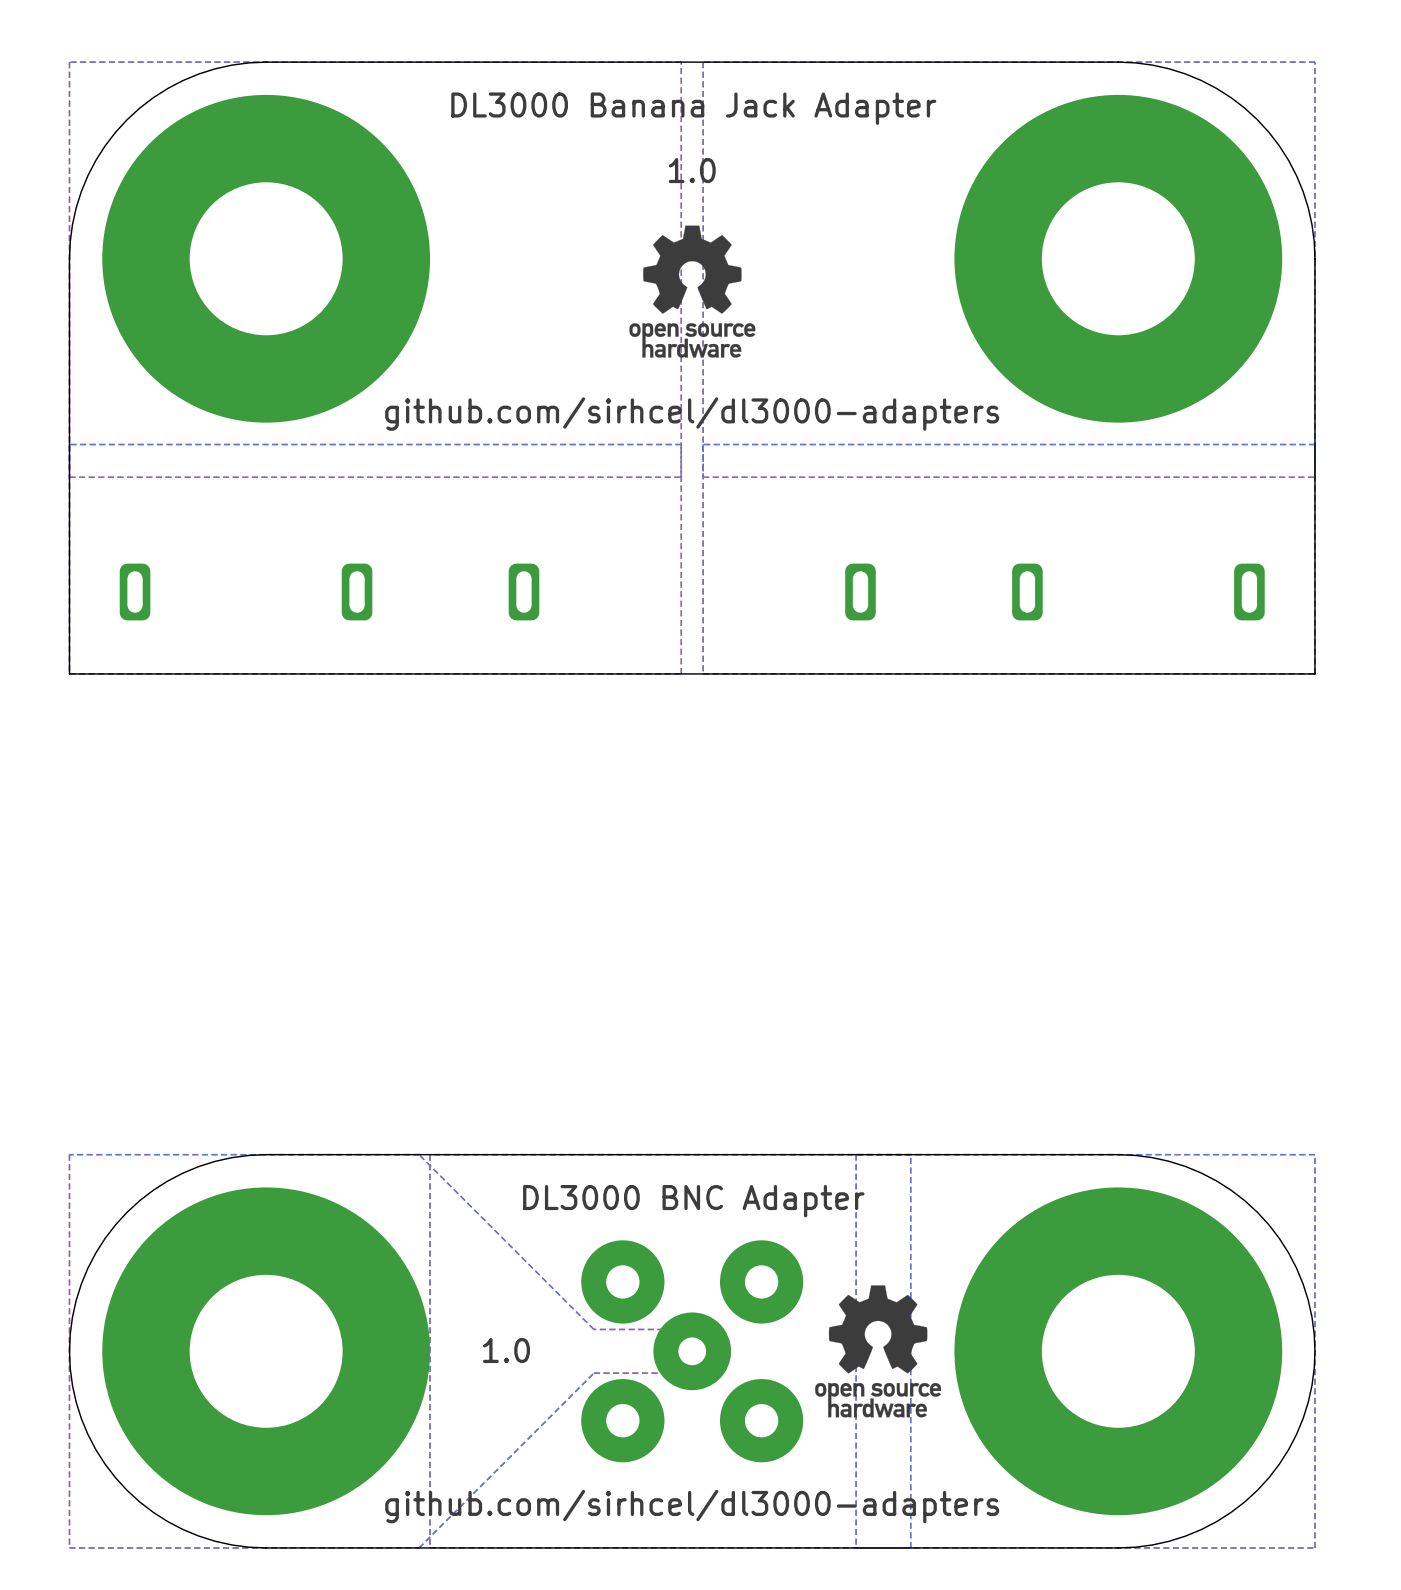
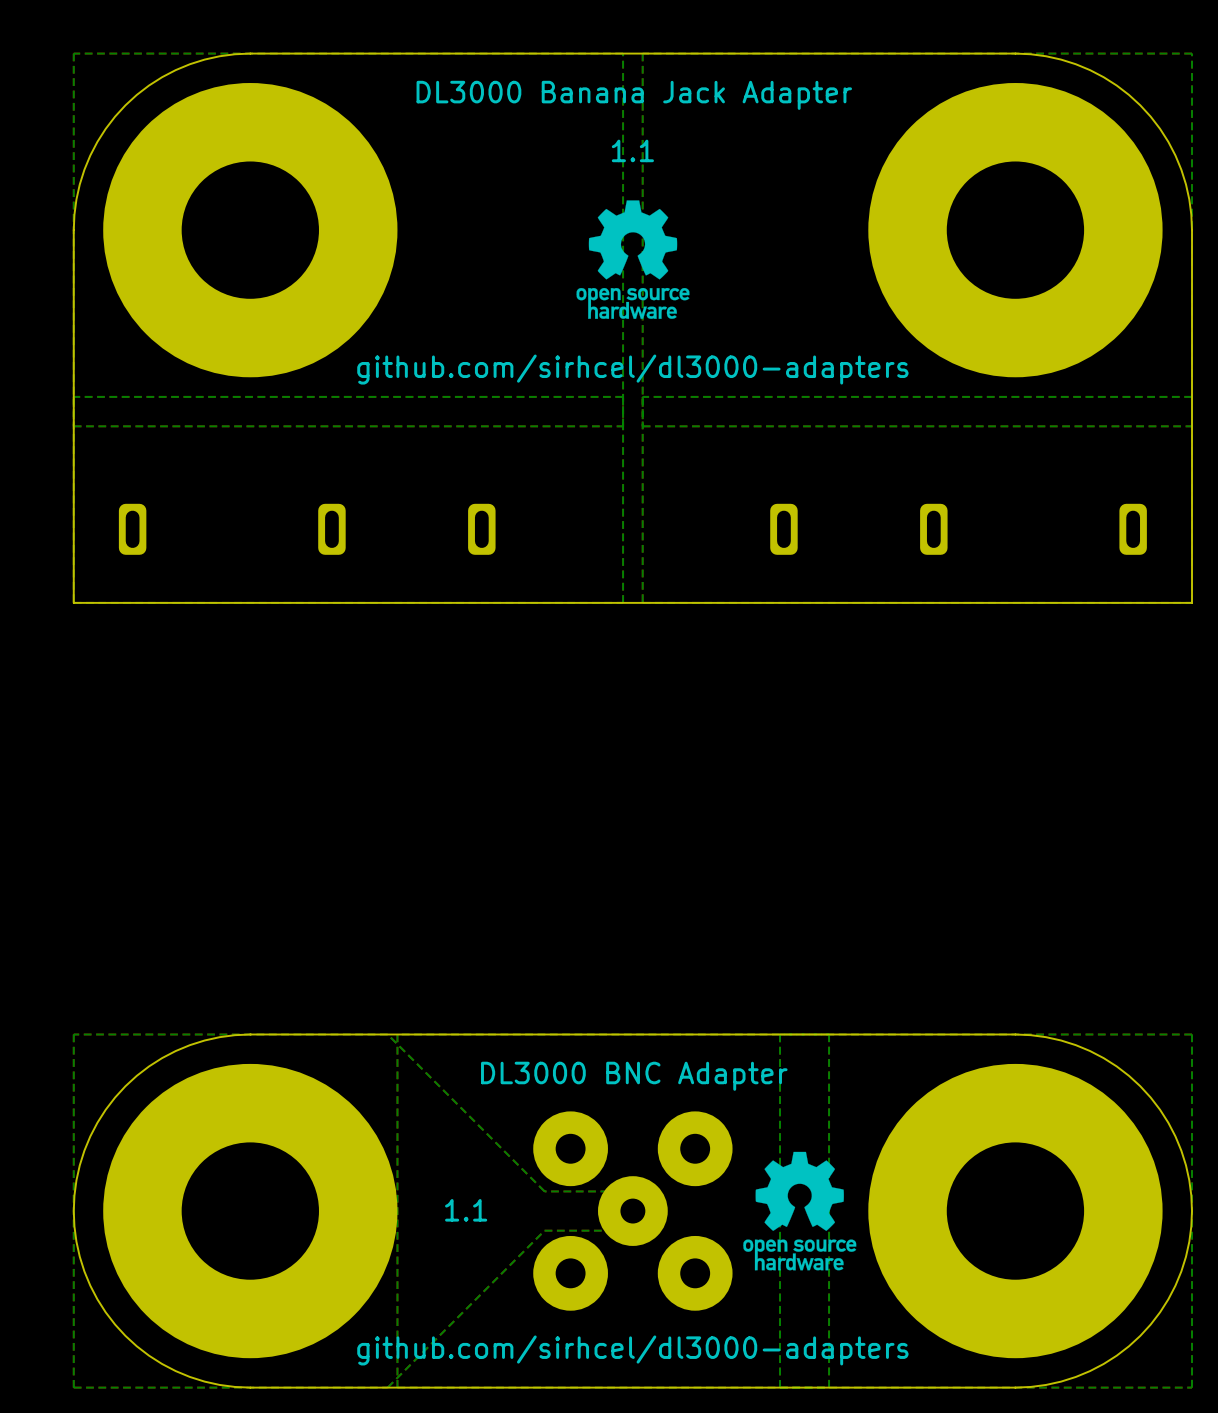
text: 1.0 (692, 170) -> 1.1 (632, 150)
text: 1.0 (506, 1350) -> 1.1 (466, 1210)

